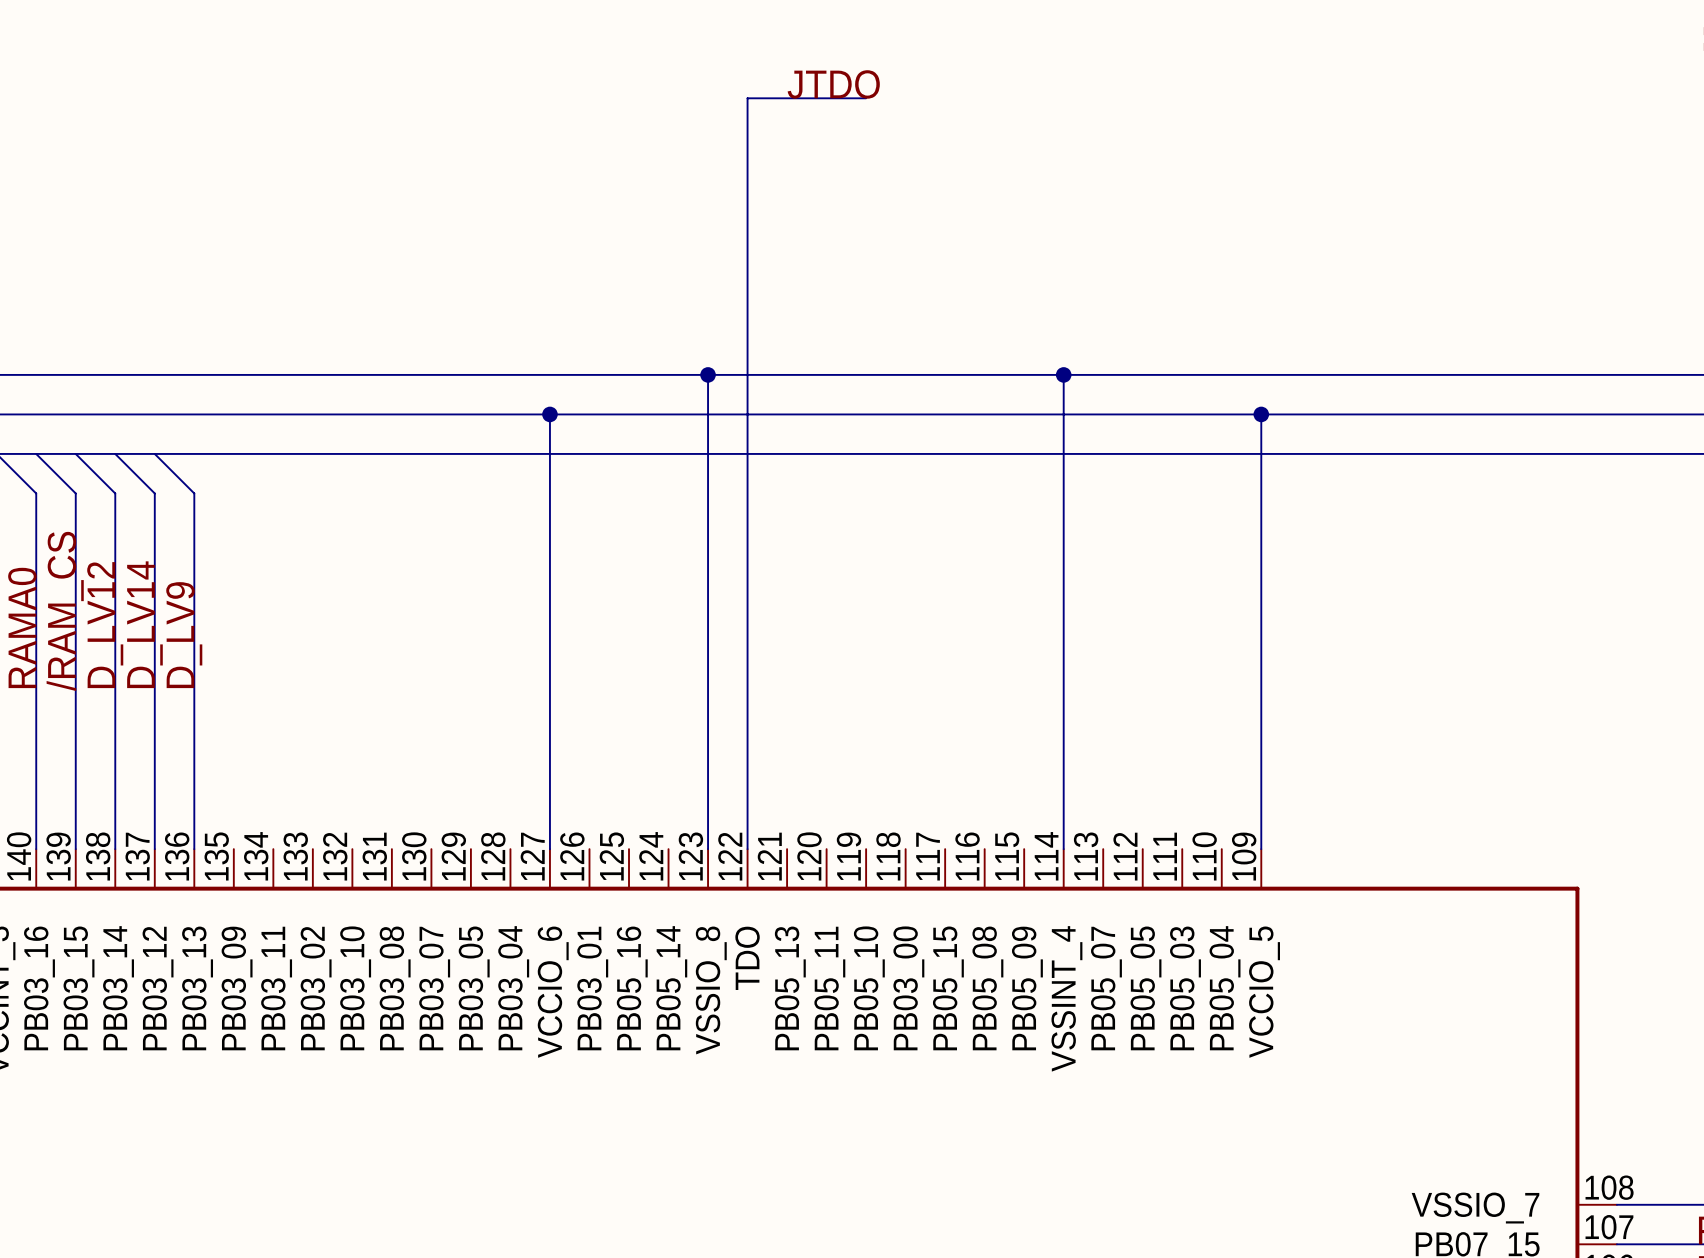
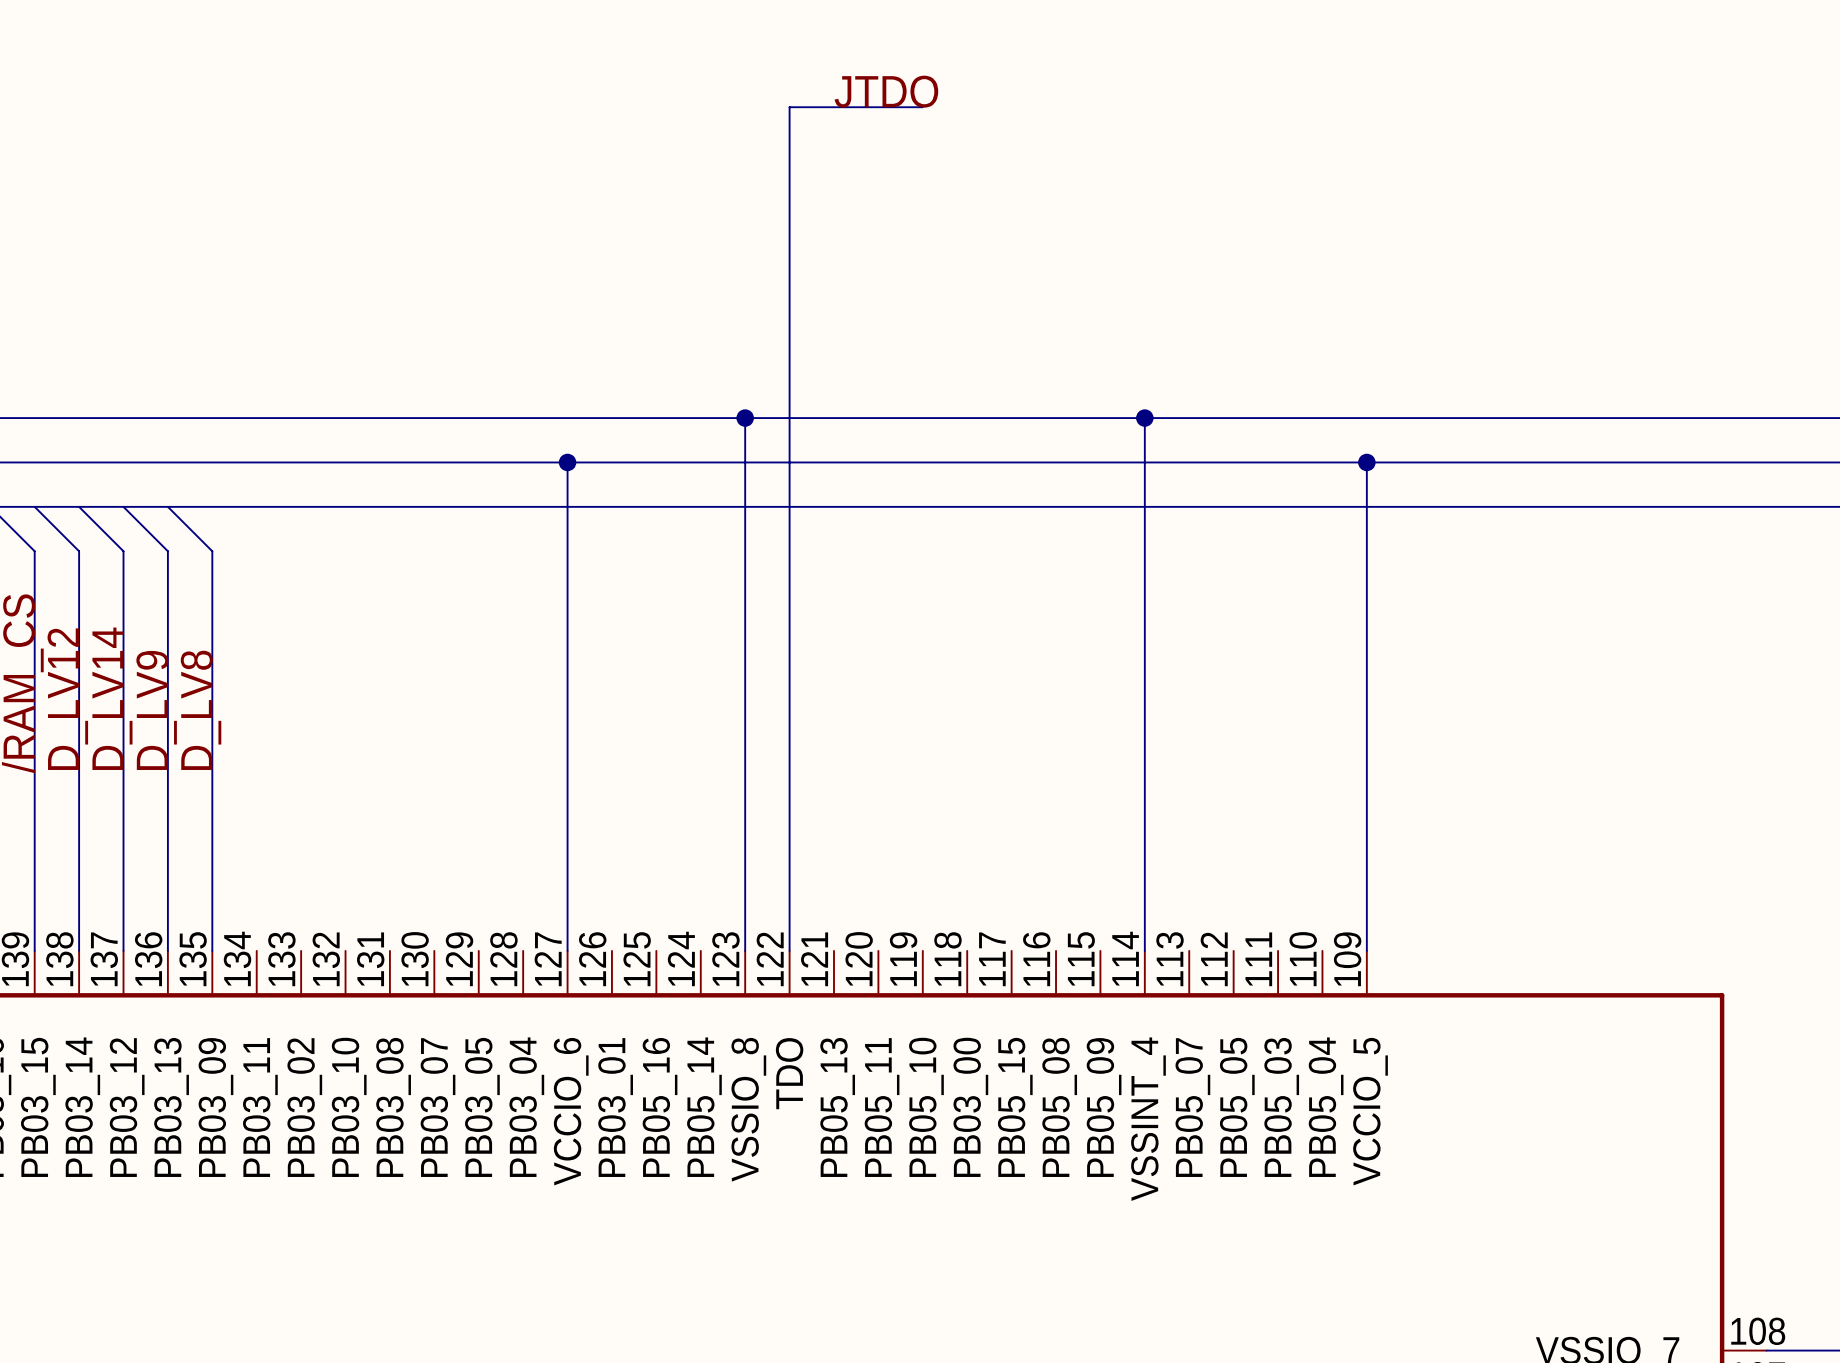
wire: none -> (167, 506) (212, 551) (212, 950)
label: none -> D_LV8 (201, 710)

